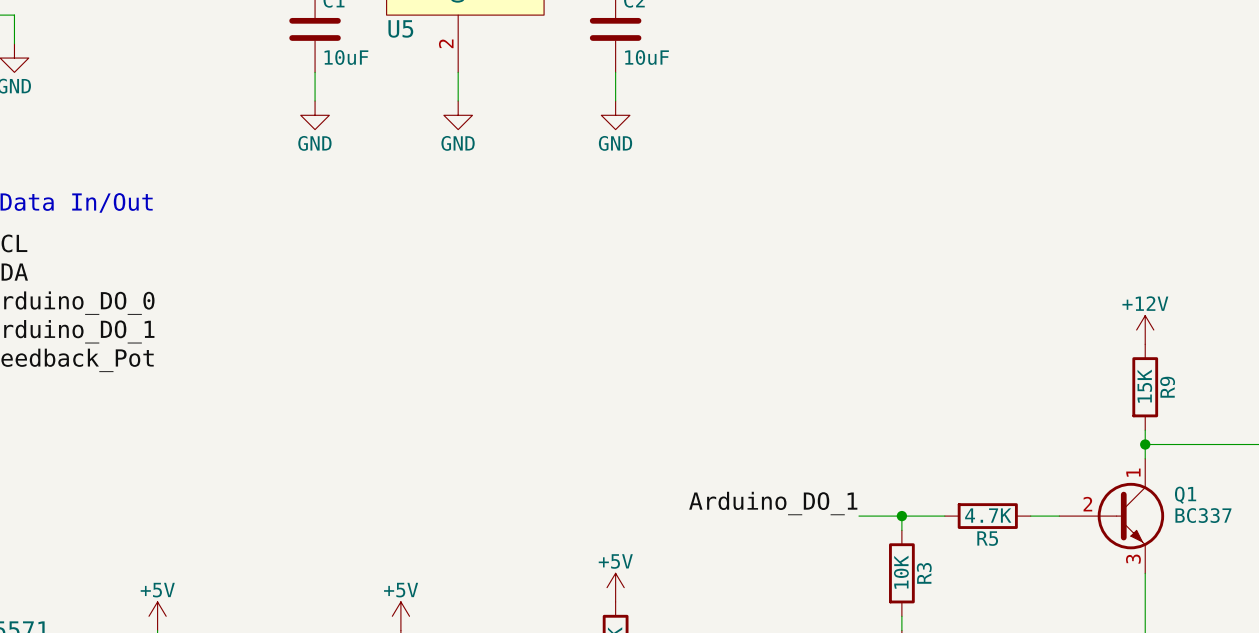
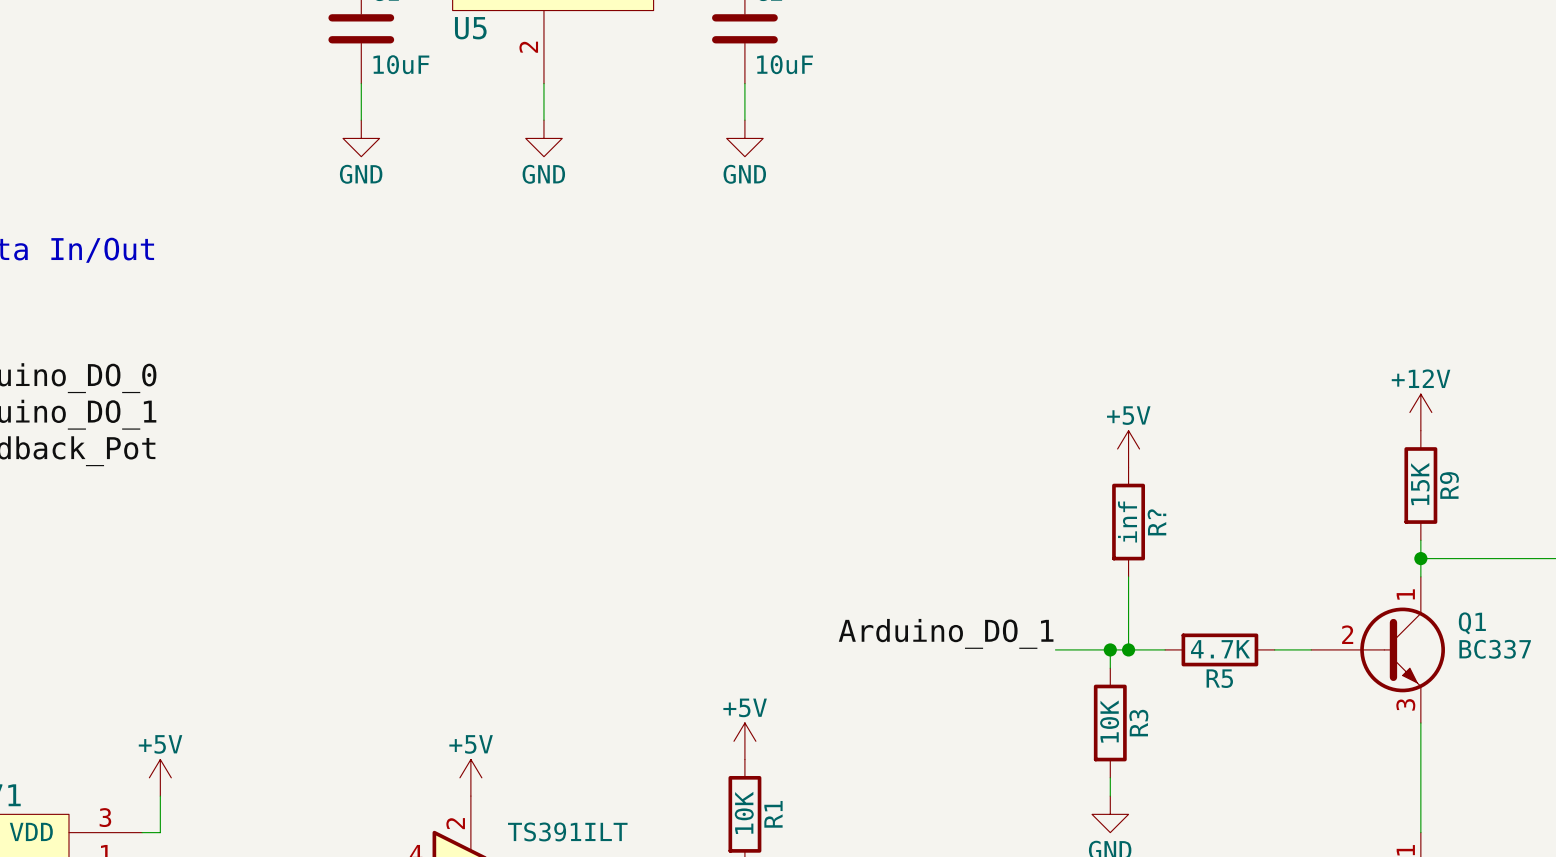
power symbol: none -> +5V (1128, 448)
R?: none -> inf (1128, 522)
wire: none -> (1128, 576) (1128, 649)
junction: none -> (1128, 649)

